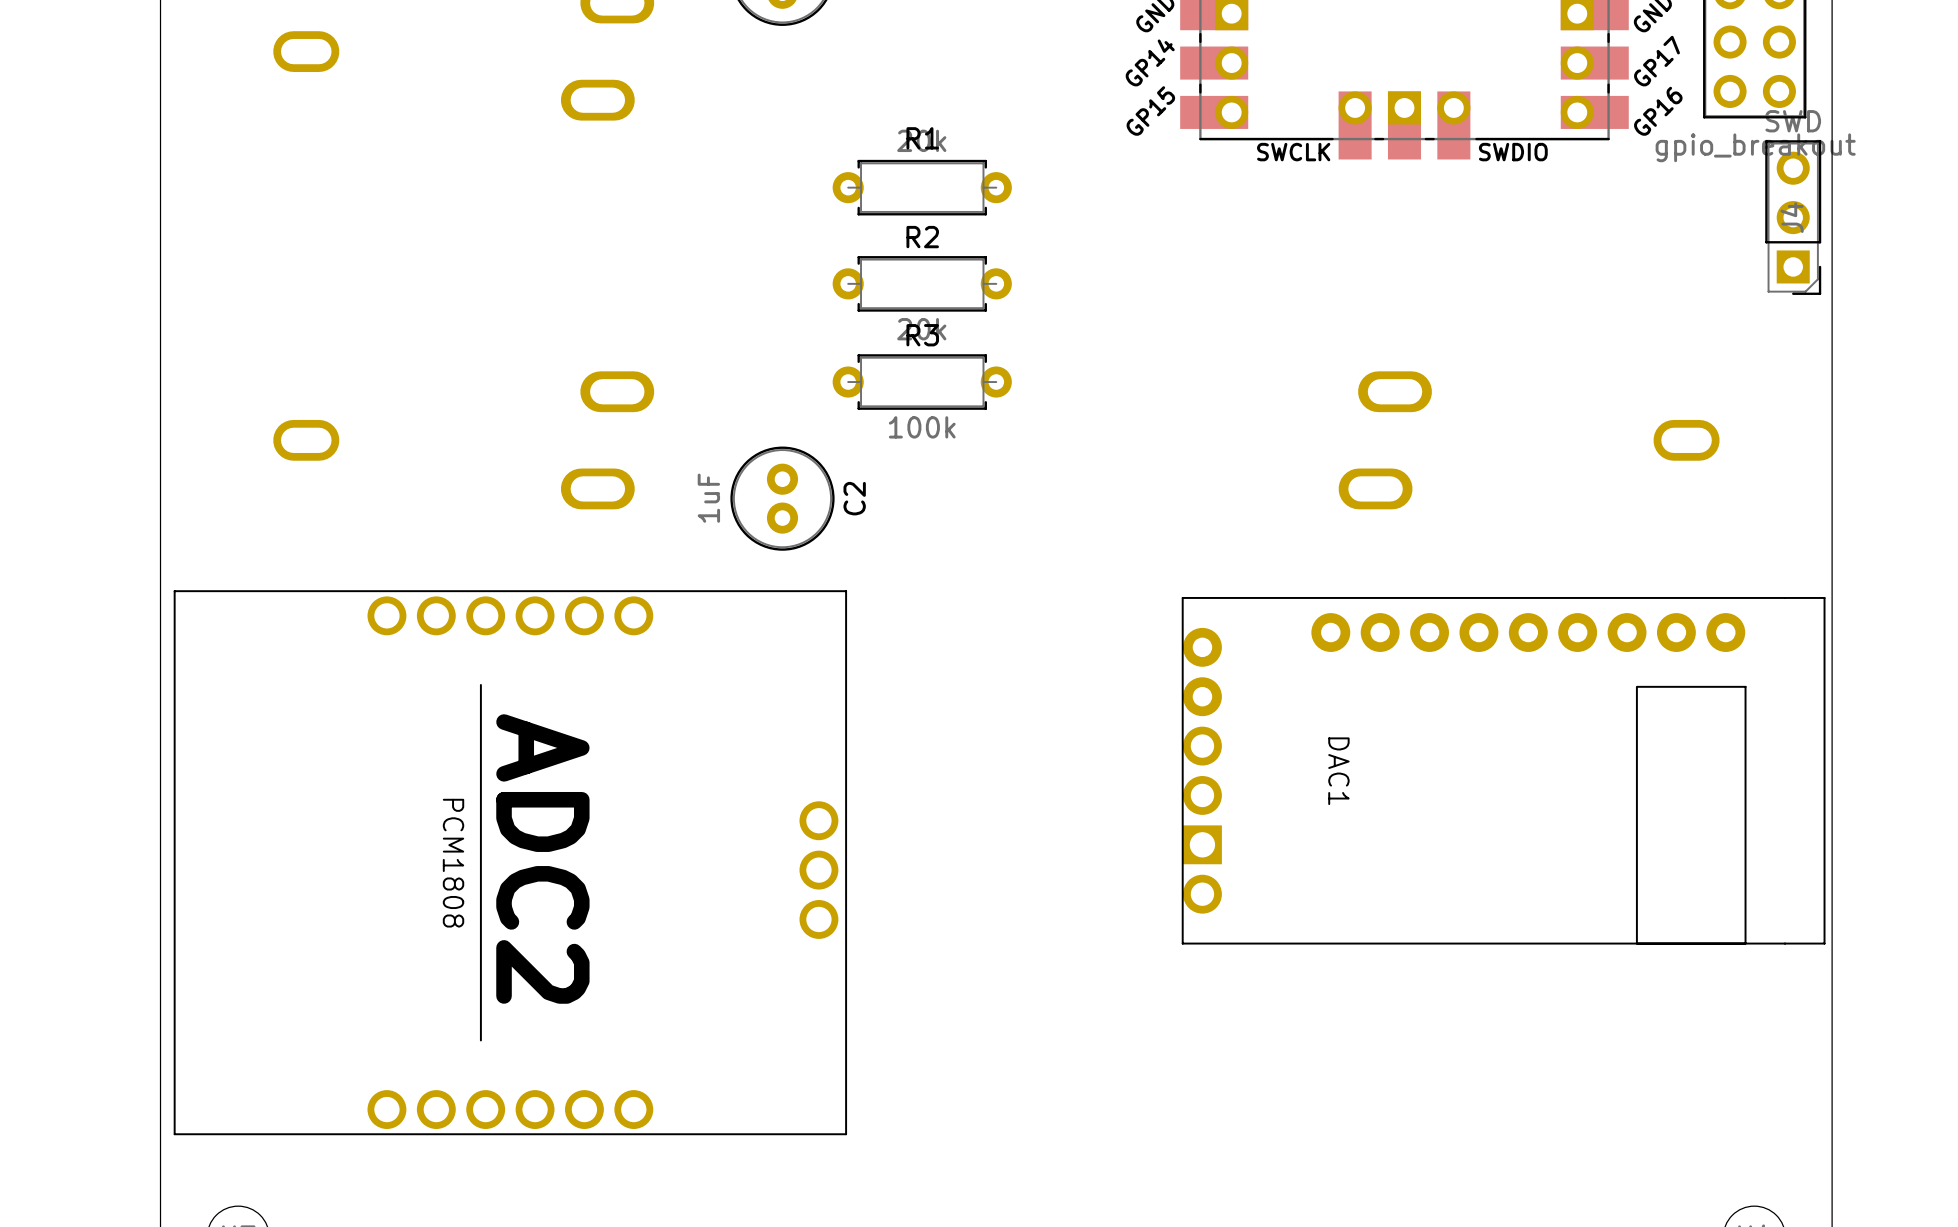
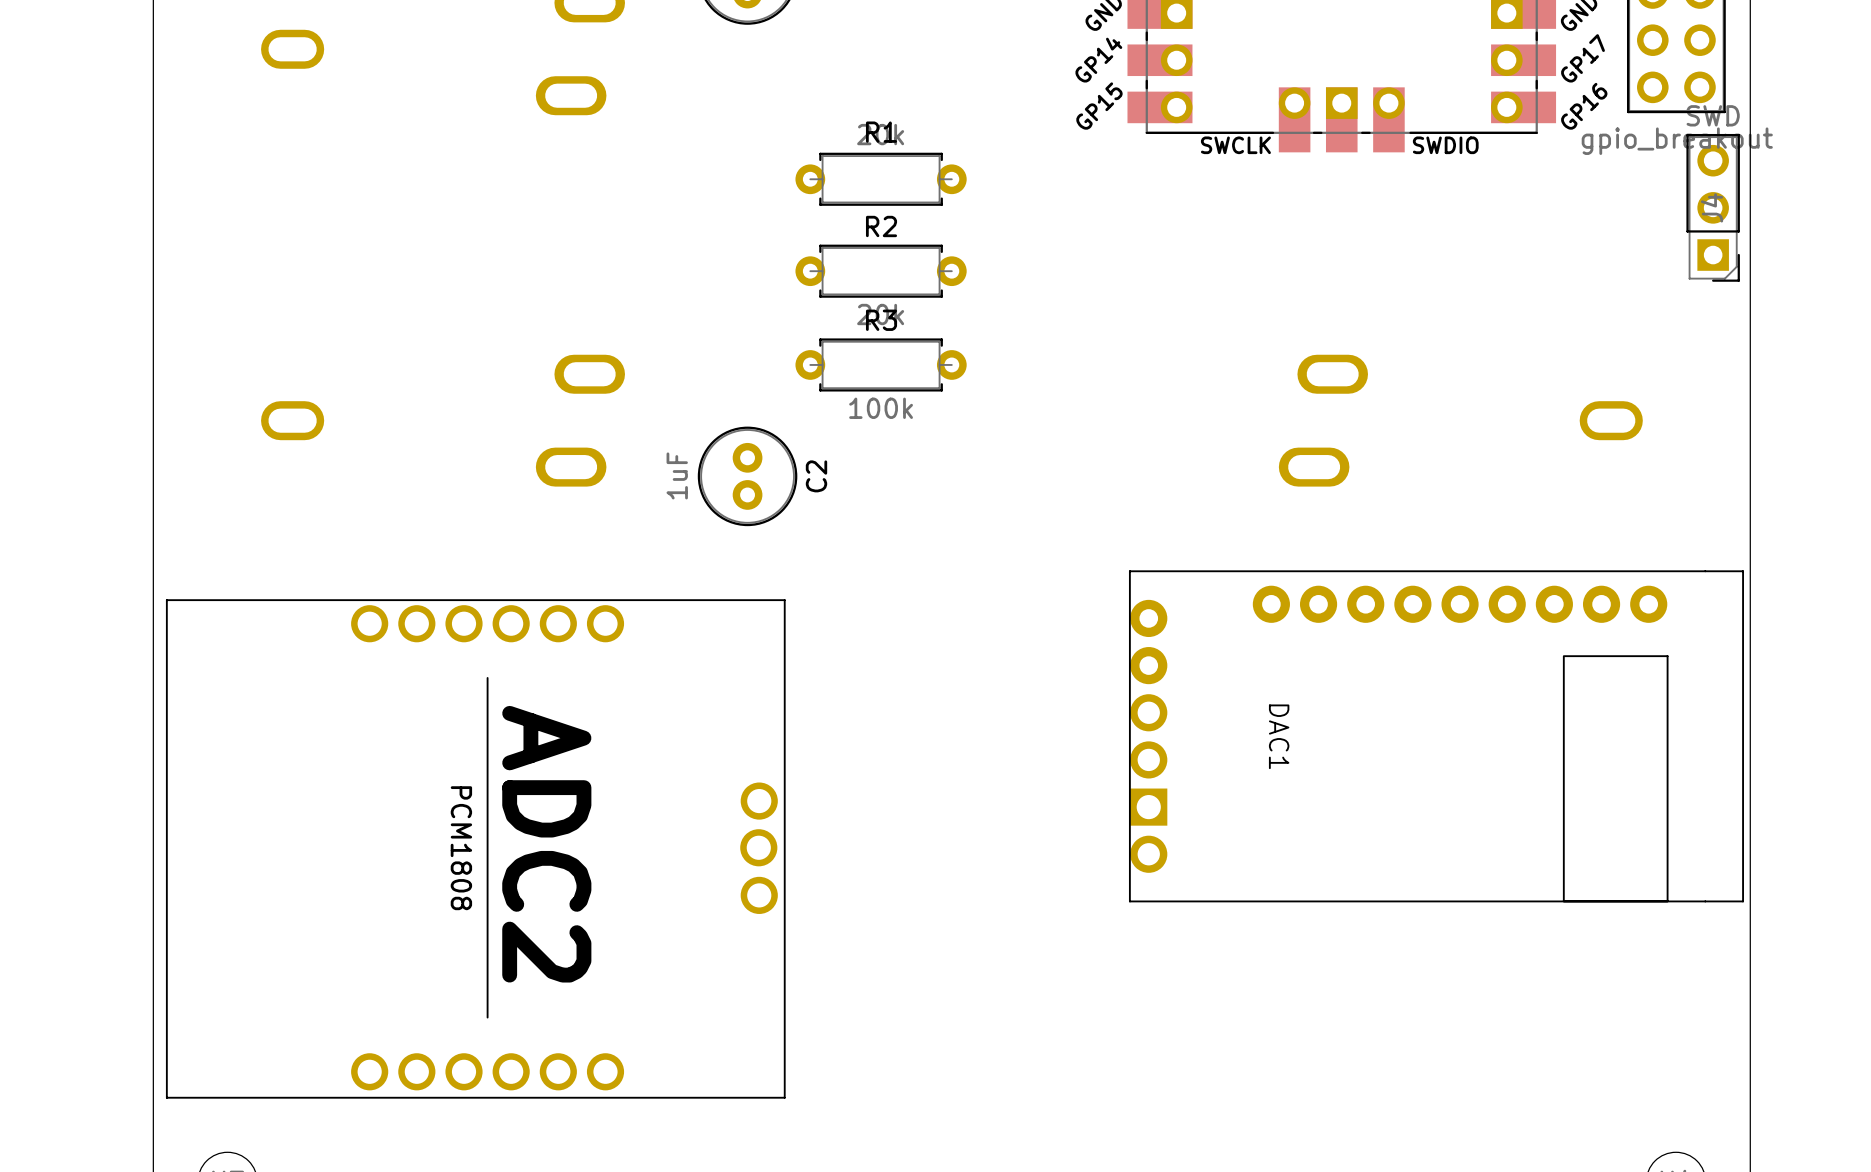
ADC2 footprint: [173, 590, 848, 1136] -> [165, 599, 786, 1099]
ADC2 name position: ADC2 (542, 859) -> ADC2 (546, 844)

